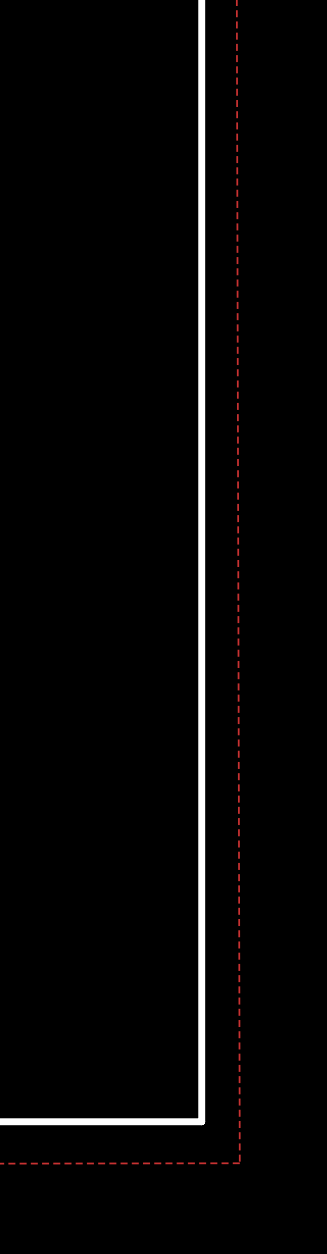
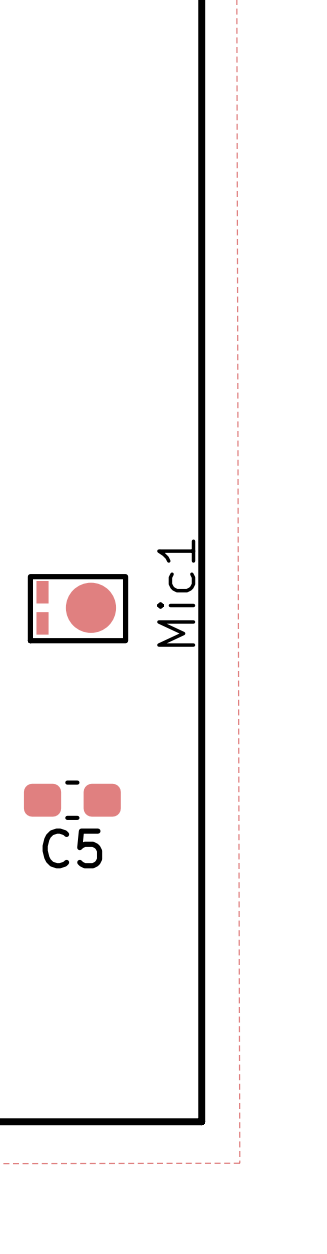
Mic1: none -> (77, 608)
C5: none -> (72, 800)

